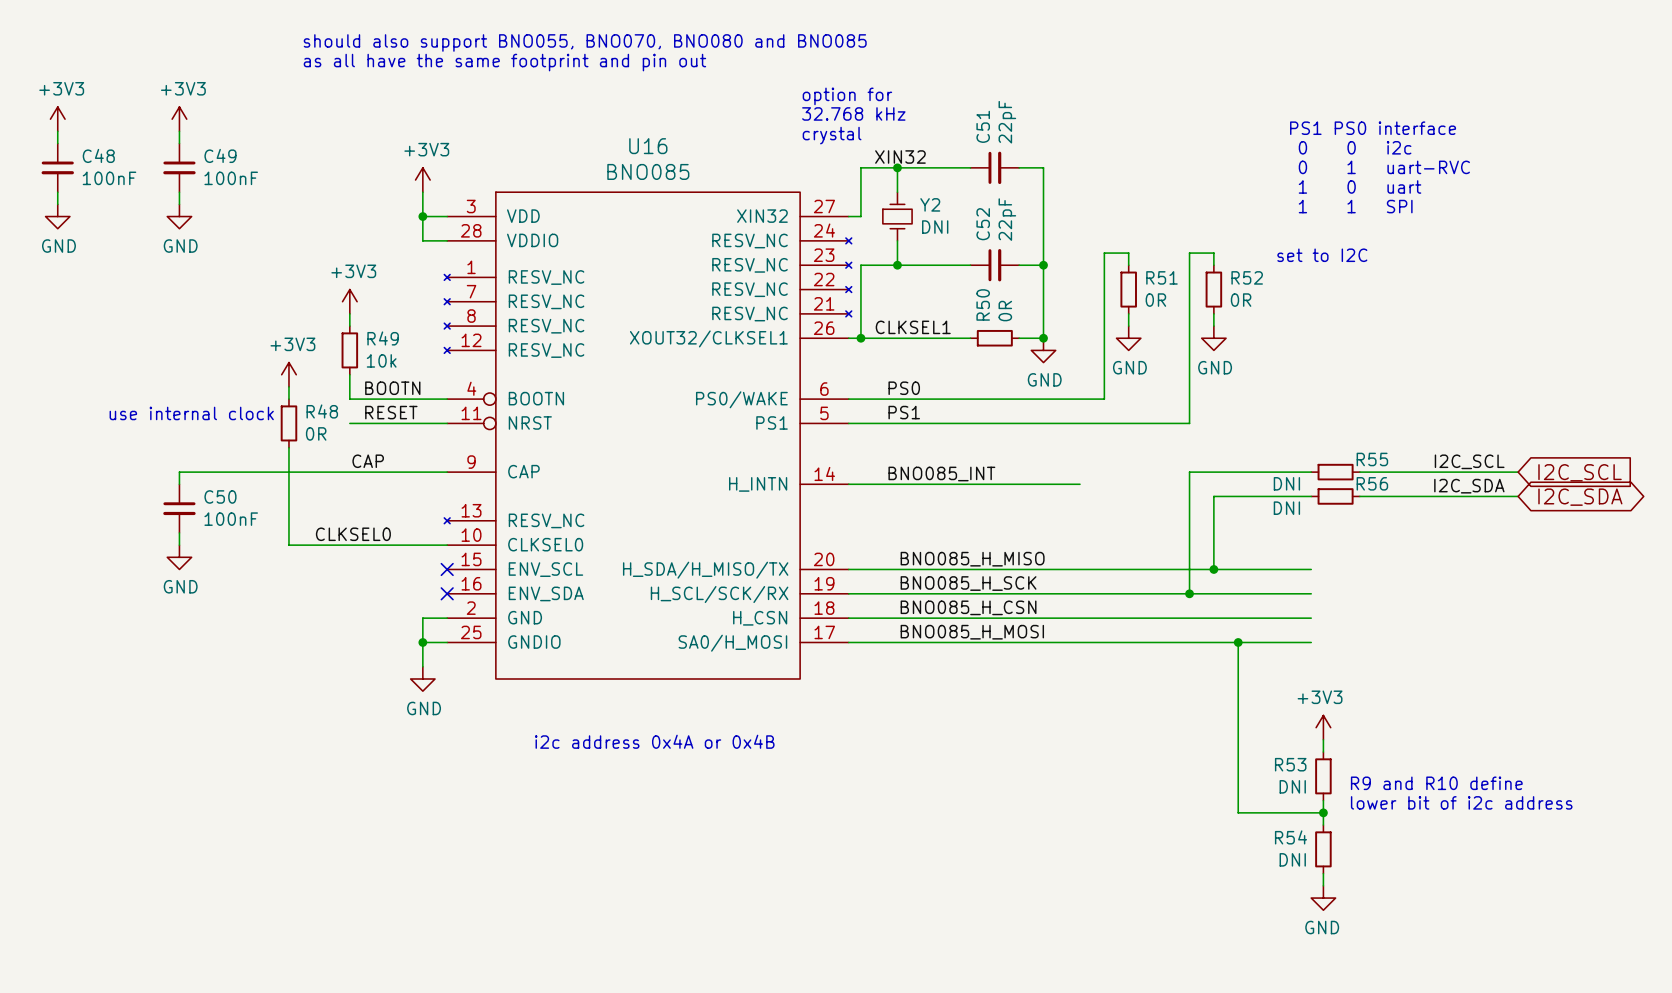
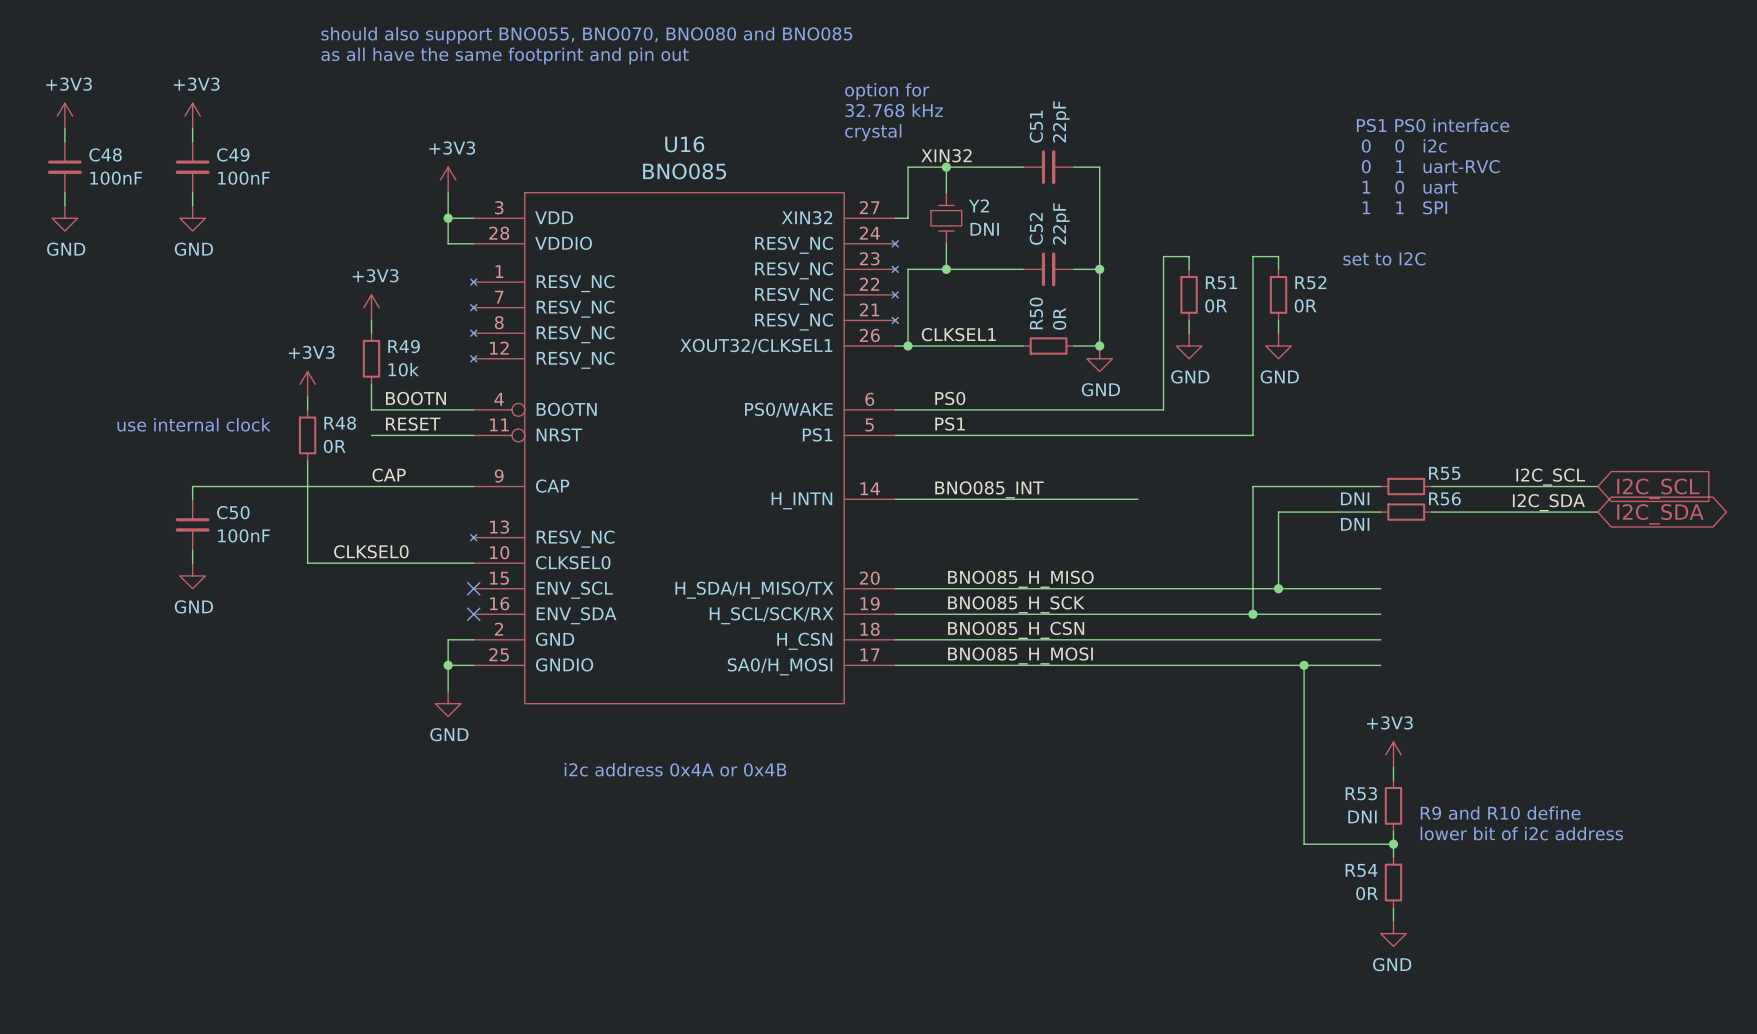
R54 value: DNI (1292, 859) -> 0R (1367, 893)

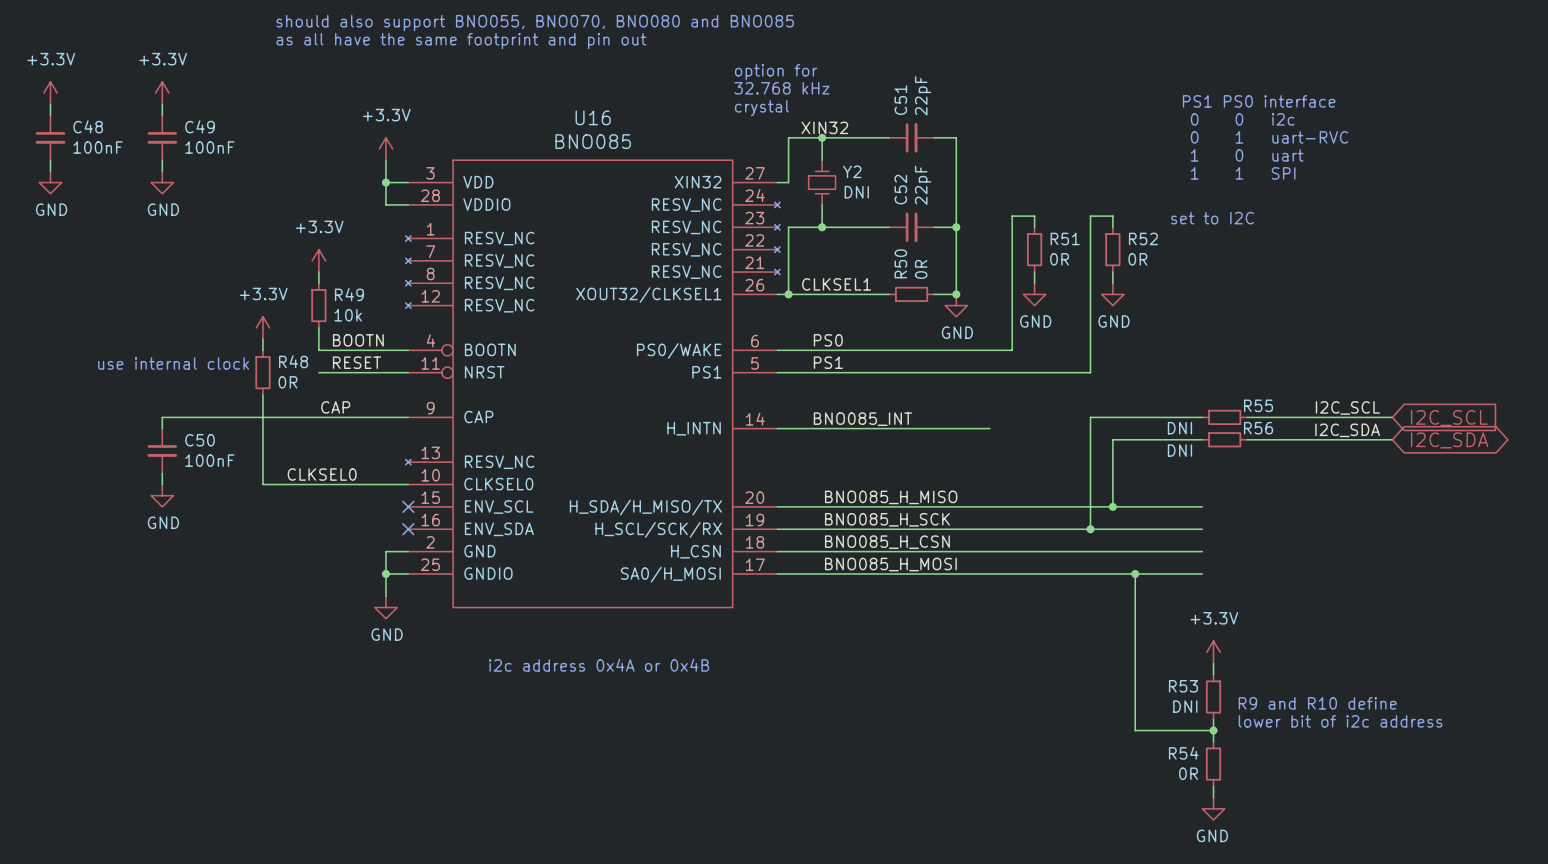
power symbol: +3V3 (64, 116) -> +3.3V (50, 93)
power symbol: +3V3 (192, 116) -> +3.3V (162, 93)
power symbol: +3V3 (448, 179) -> +3.3V (385, 149)
power symbol: +3V3 (371, 307) -> +3.3V (318, 260)
power symbol: +3V3 (307, 384) -> +3.3V (262, 327)
power symbol: +3V3 (1393, 754) -> +3.3V (1213, 652)

